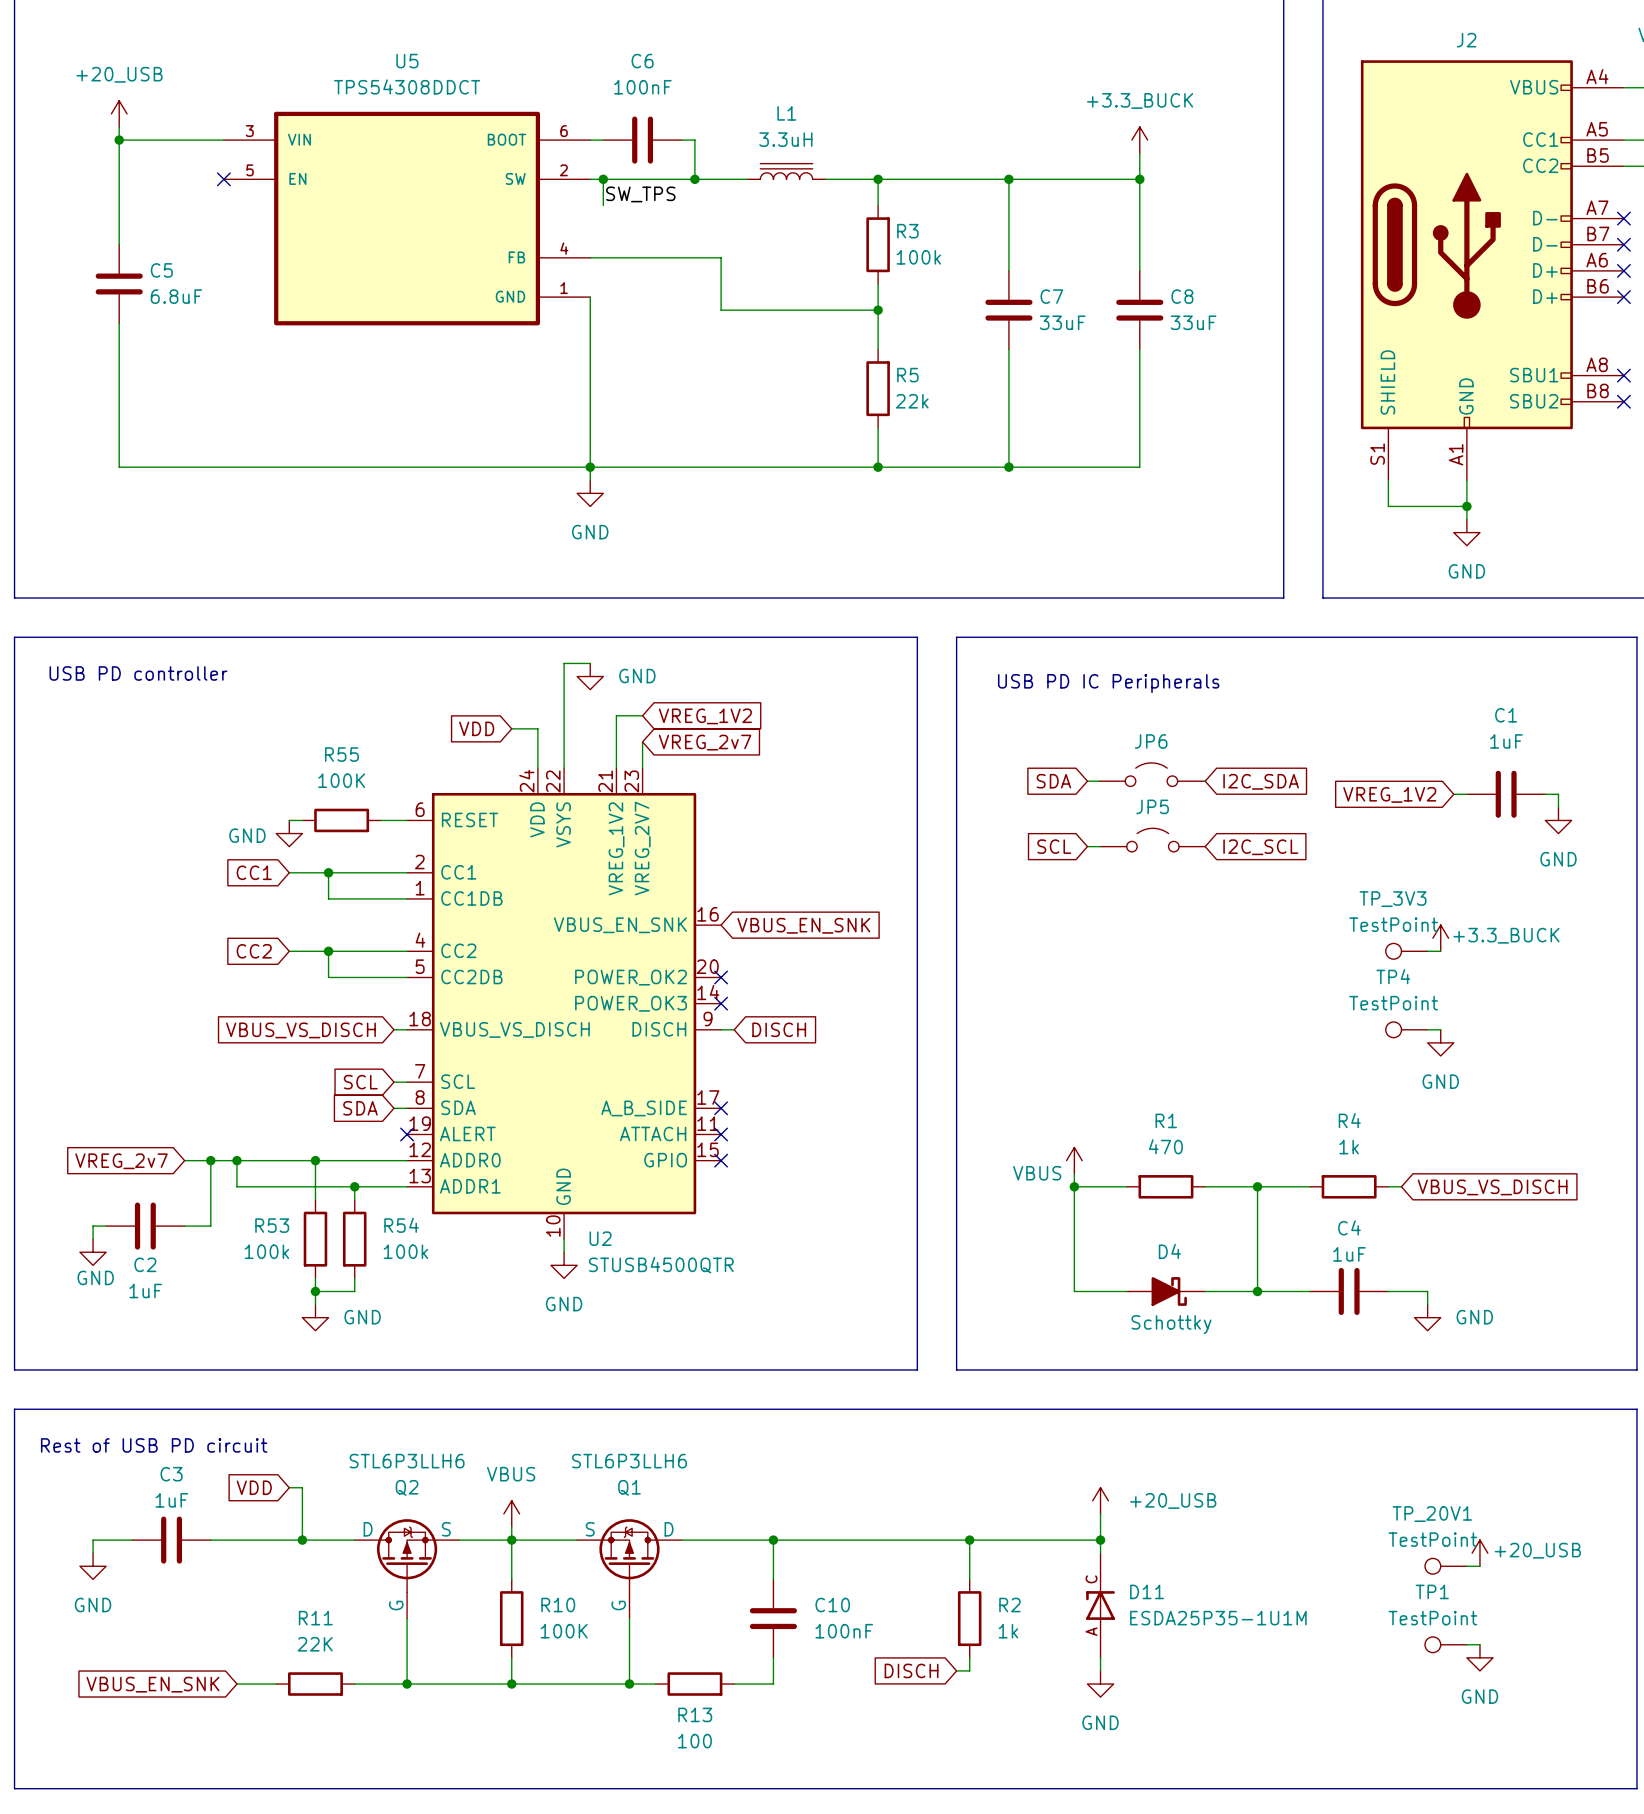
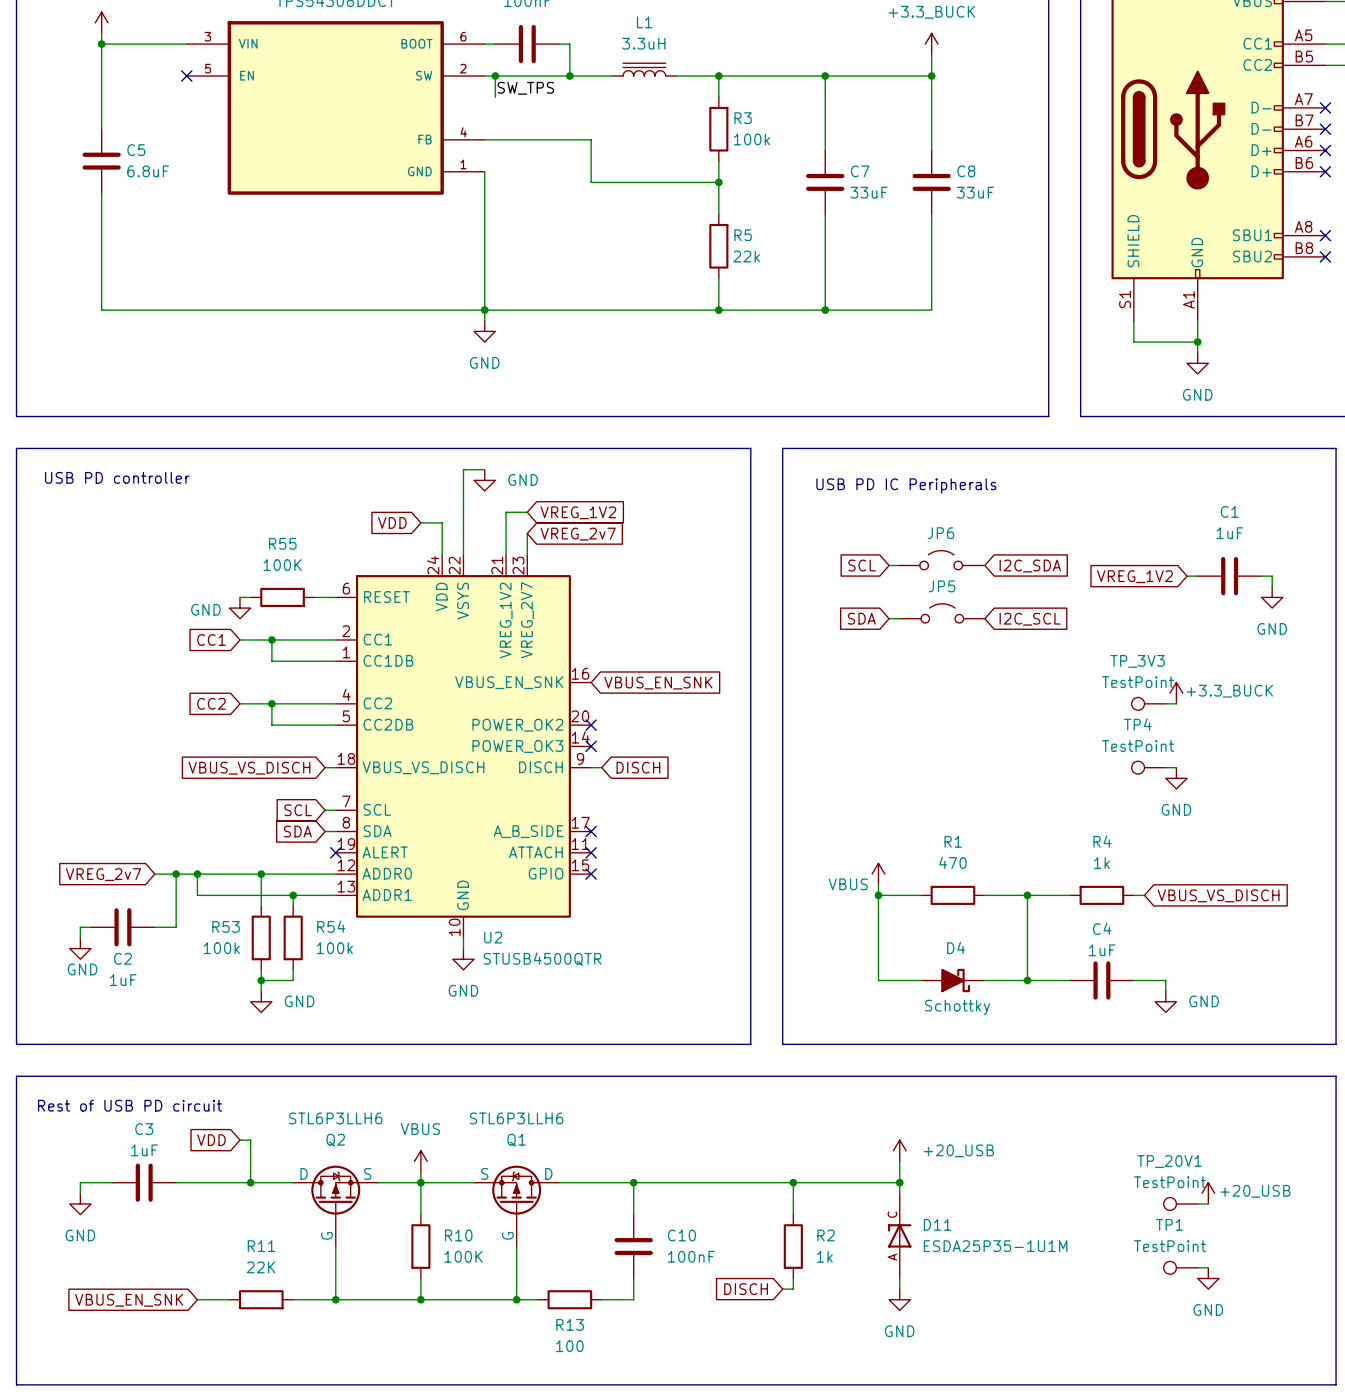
global label: SDA (1053, 781) -> SCL (862, 565)
global label: SCL (1054, 846) -> SDA (861, 618)

